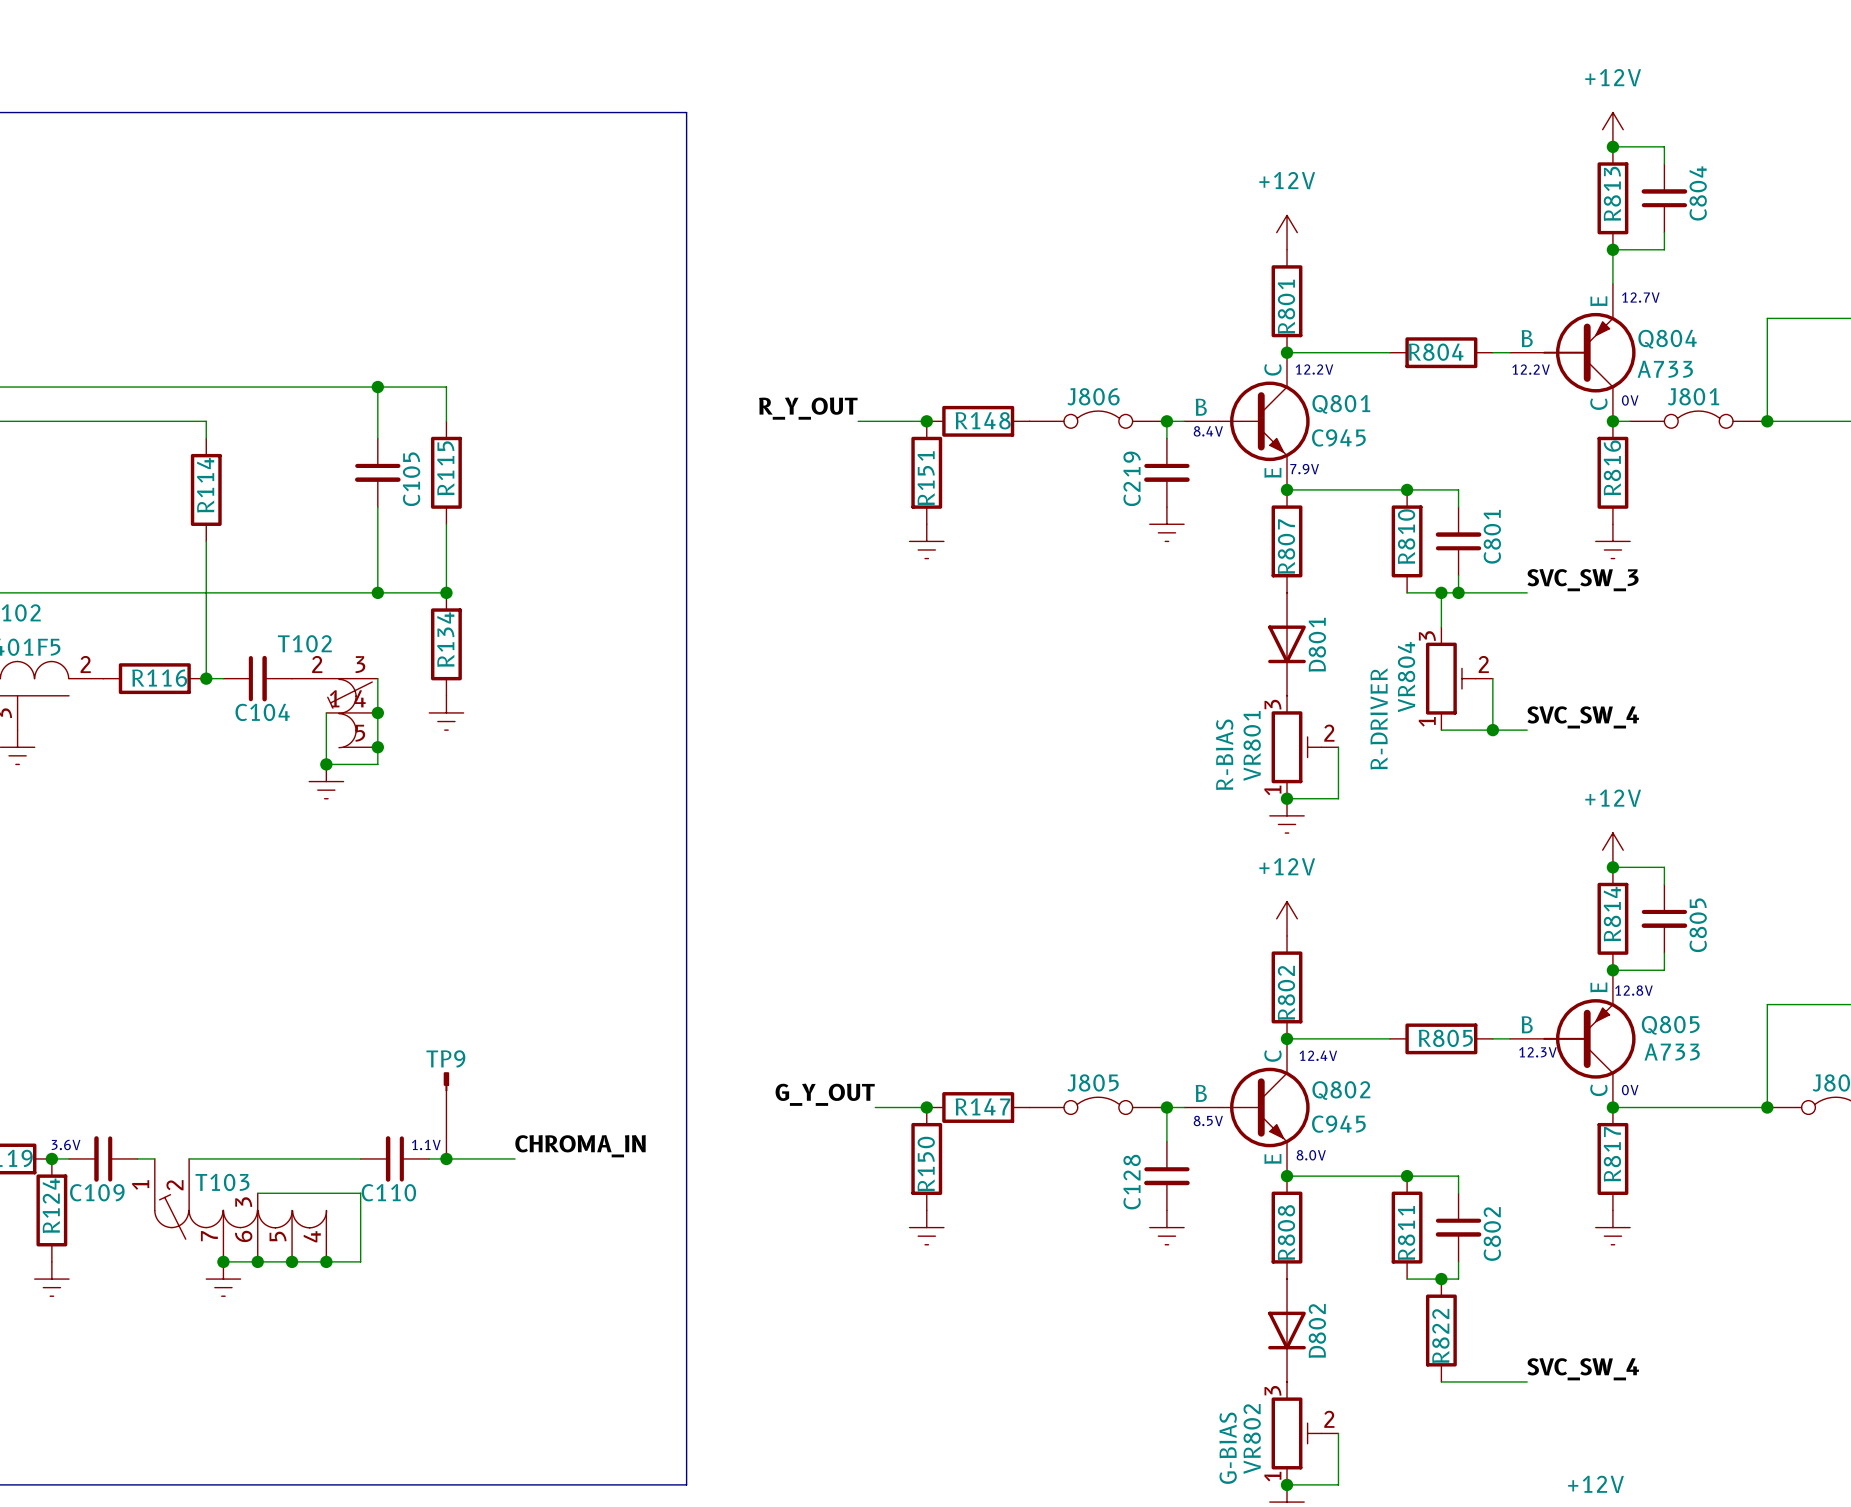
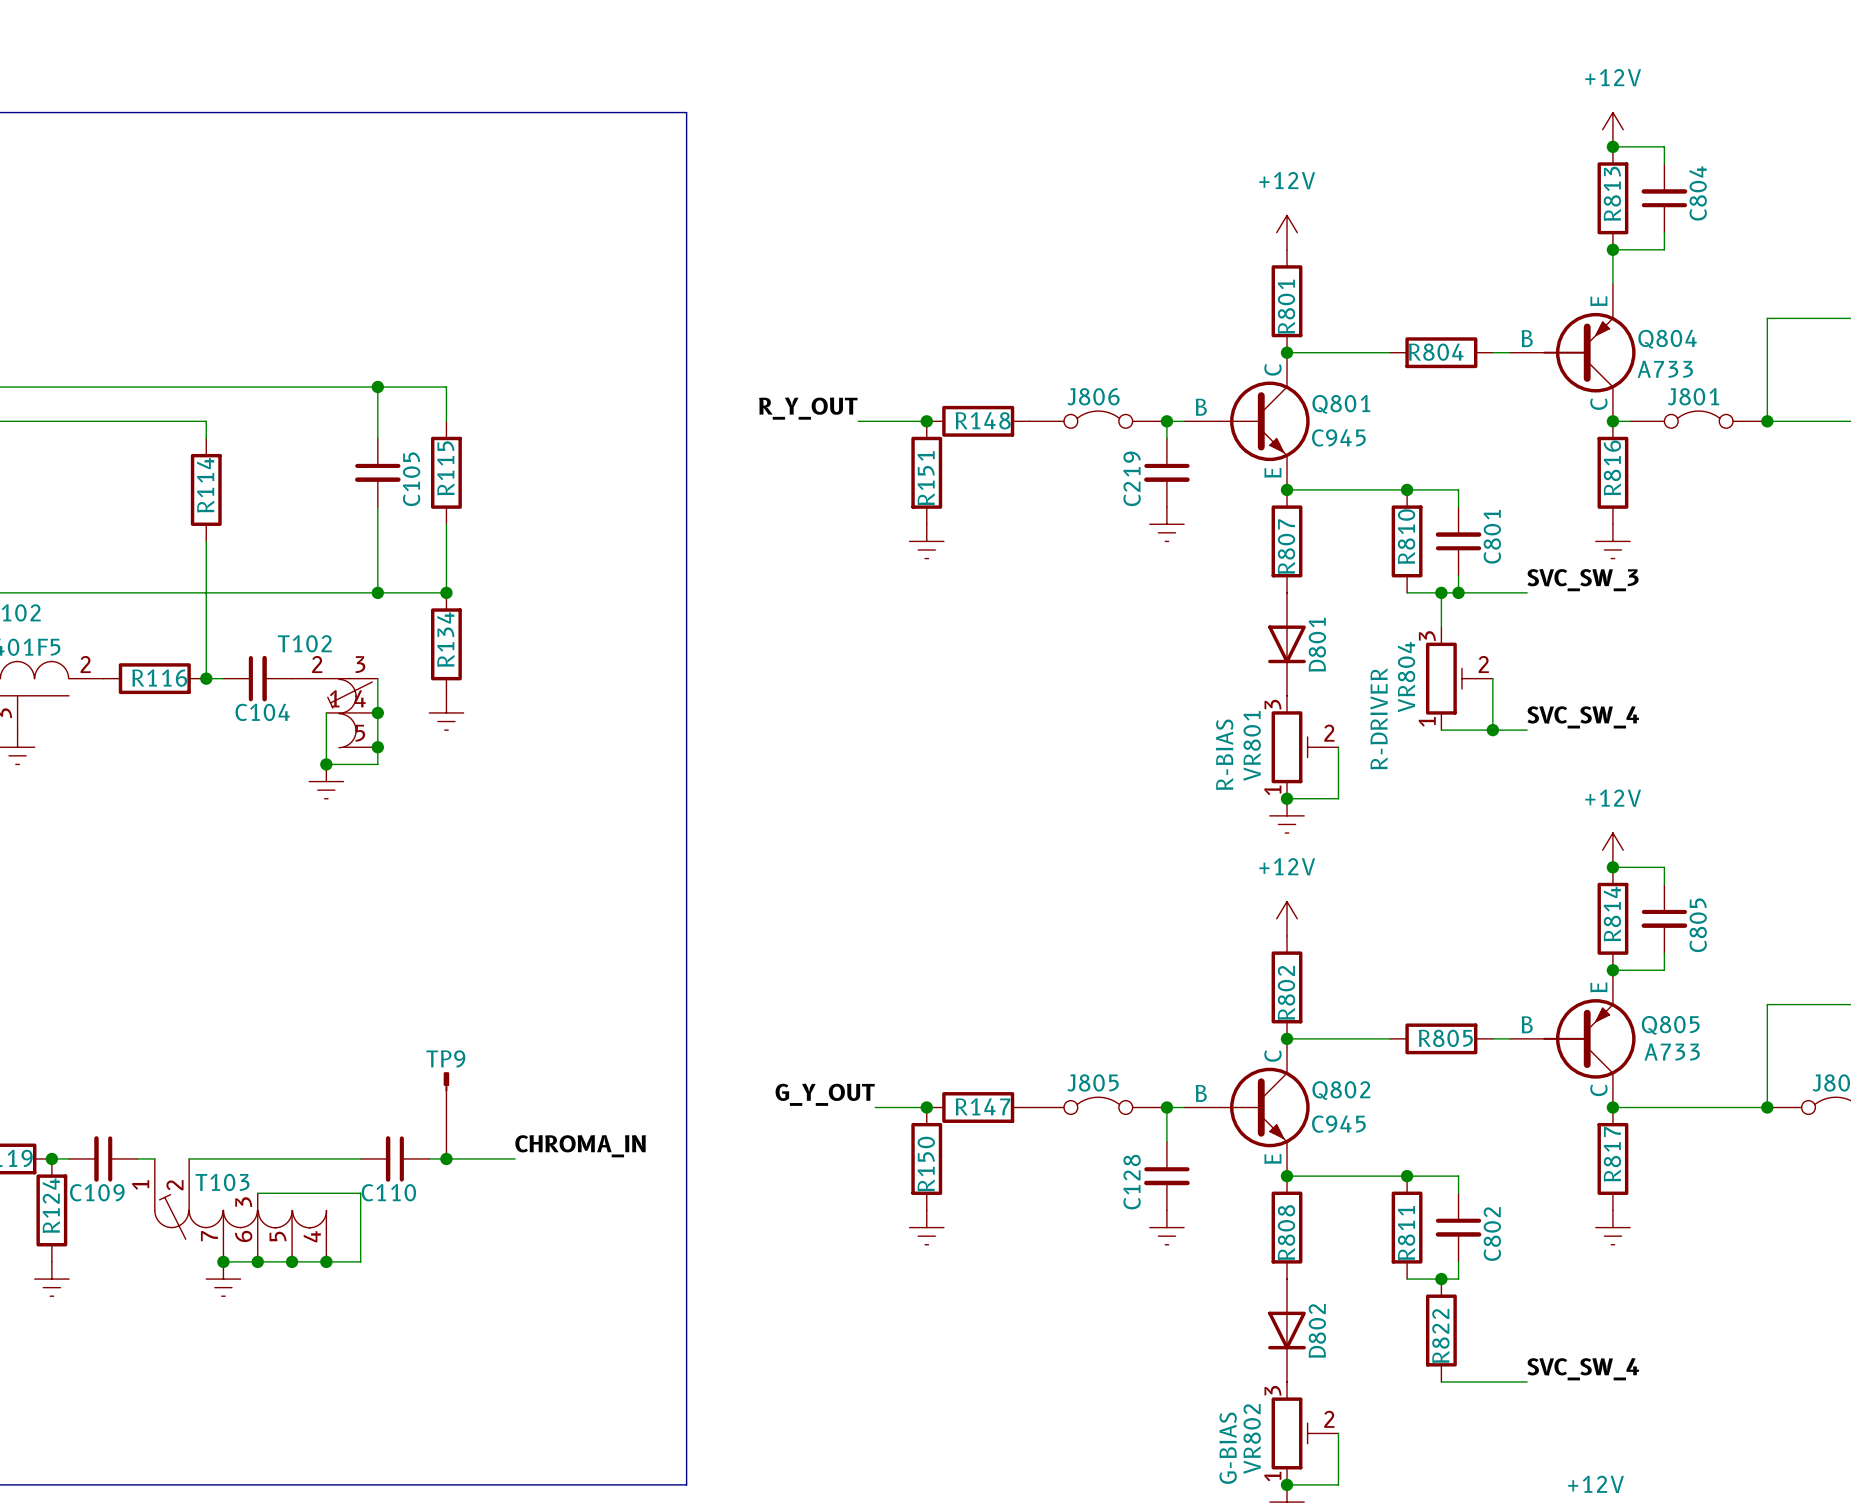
text: 12.7V (1640, 297) -> none
text: 12.2V (1314, 369) -> none
text: 12.2V (1531, 369) -> none
text: 0V (1630, 400) -> none
text: 8.4V (1208, 431) -> none
text: 7.9V (1304, 469) -> none
text: 12.8V (1633, 990) -> none
text: 12.3V (1537, 1052) -> none
text: 12.4V (1318, 1055) -> none
text: 0V (1630, 1090) -> none
text: 8.5V (1208, 1120) -> none
text: 3.6V (66, 1144) -> none
text: 1.1V (426, 1144) -> none
text: 8.0V (1311, 1155) -> none

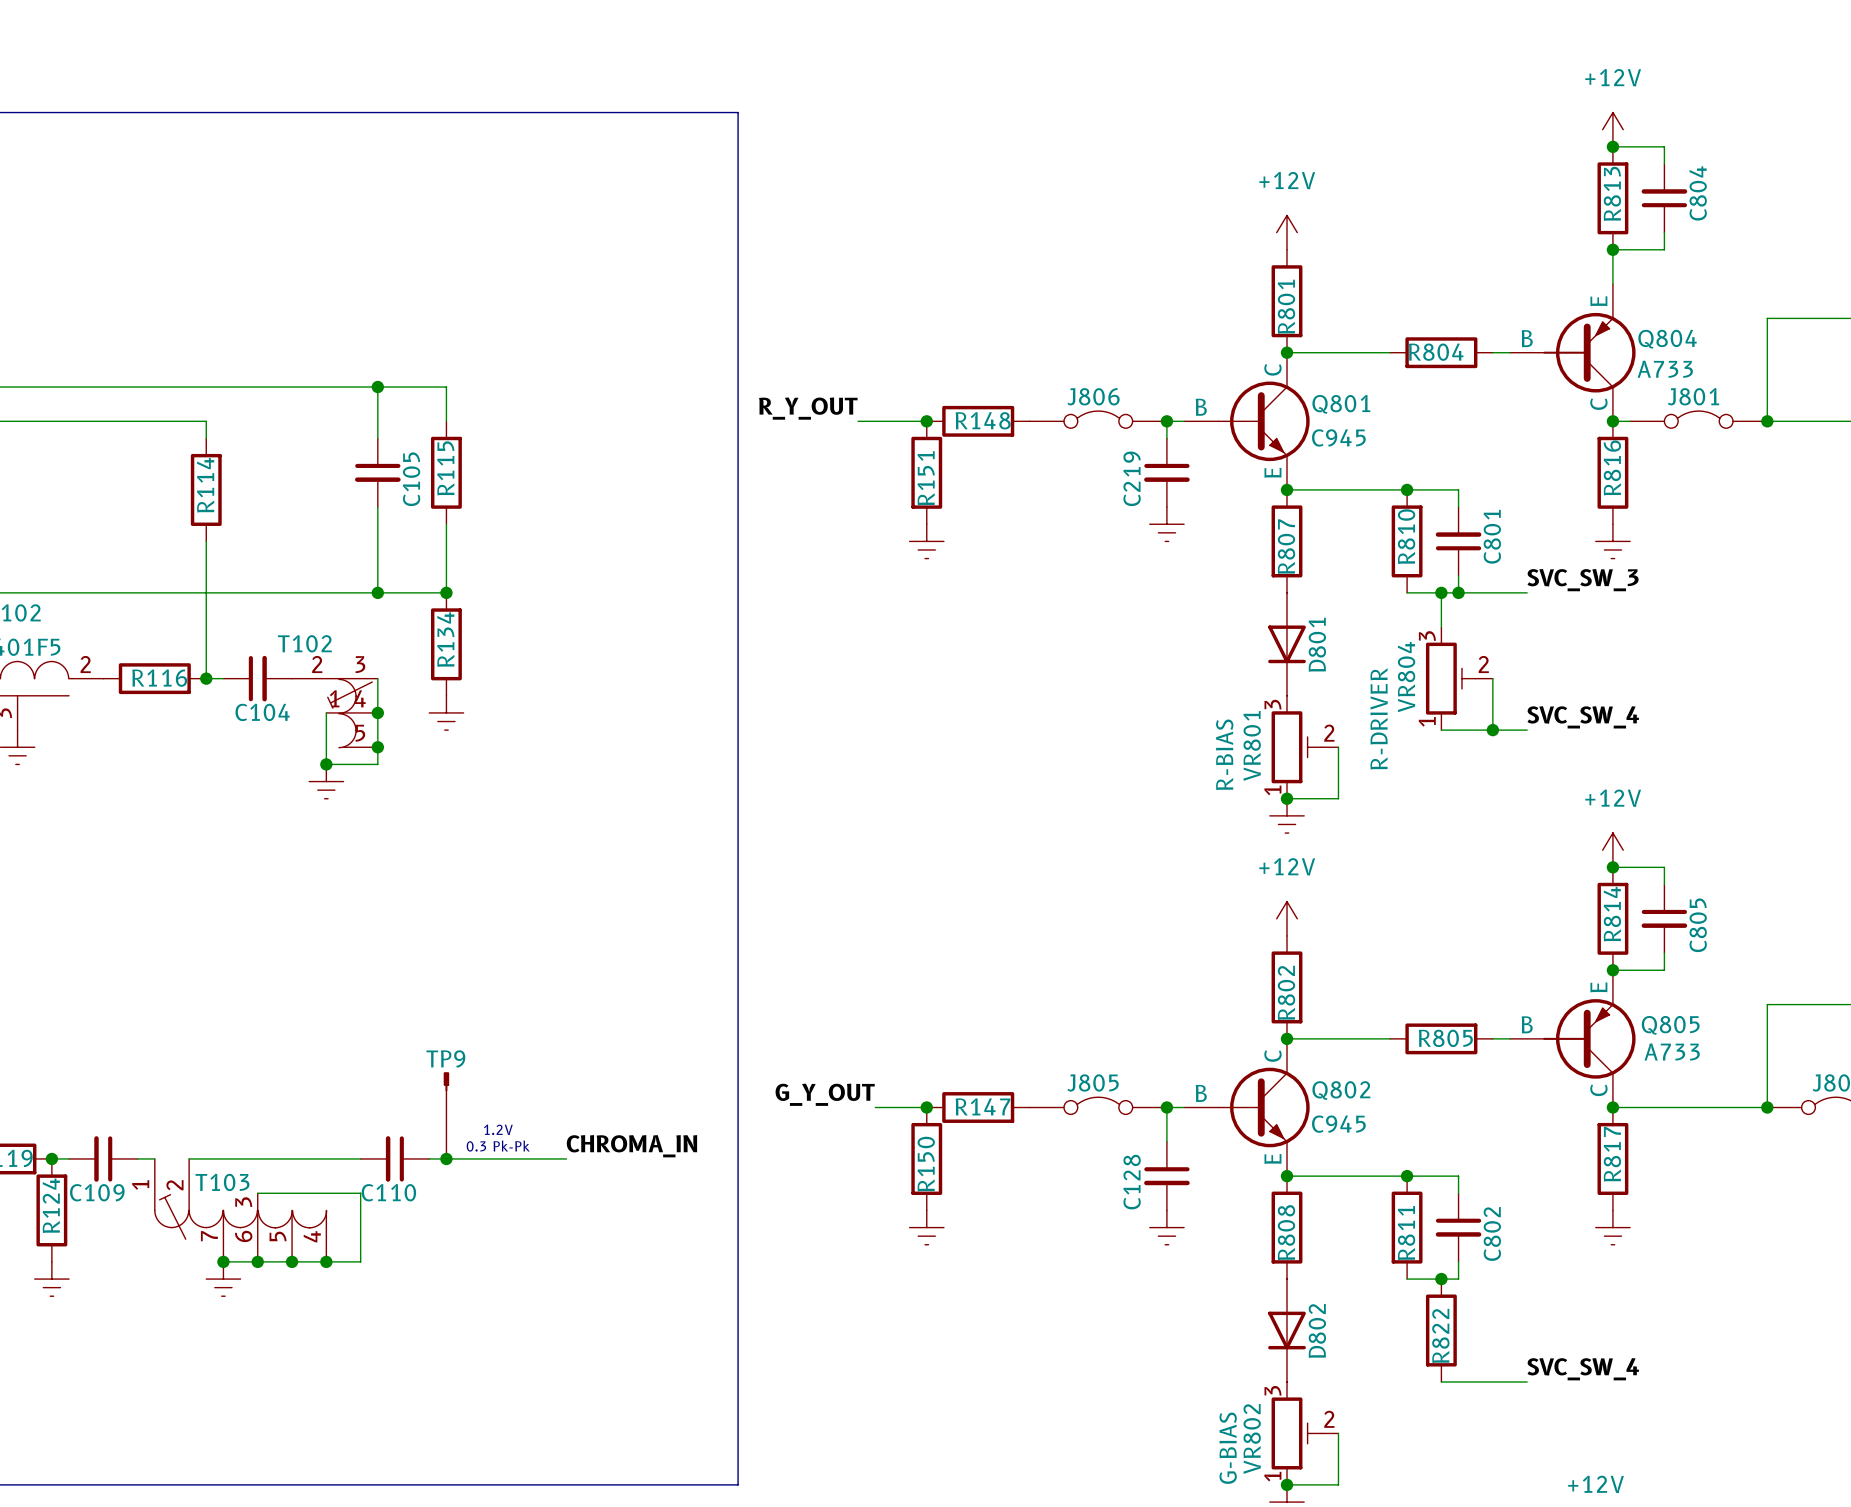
line: (686, 112) (686, 1484) -> (686, 112) (738, 112) (738, 1484) (686, 1484)
text: none -> 1.2V (498, 1129)
text: none -> 0.3 Pk-Pk (498, 1146)
label position: CHROMA_IN (580, 1146) -> CHROMA_IN (631, 1146)
wire: none -> (515, 1158) (566, 1158)

